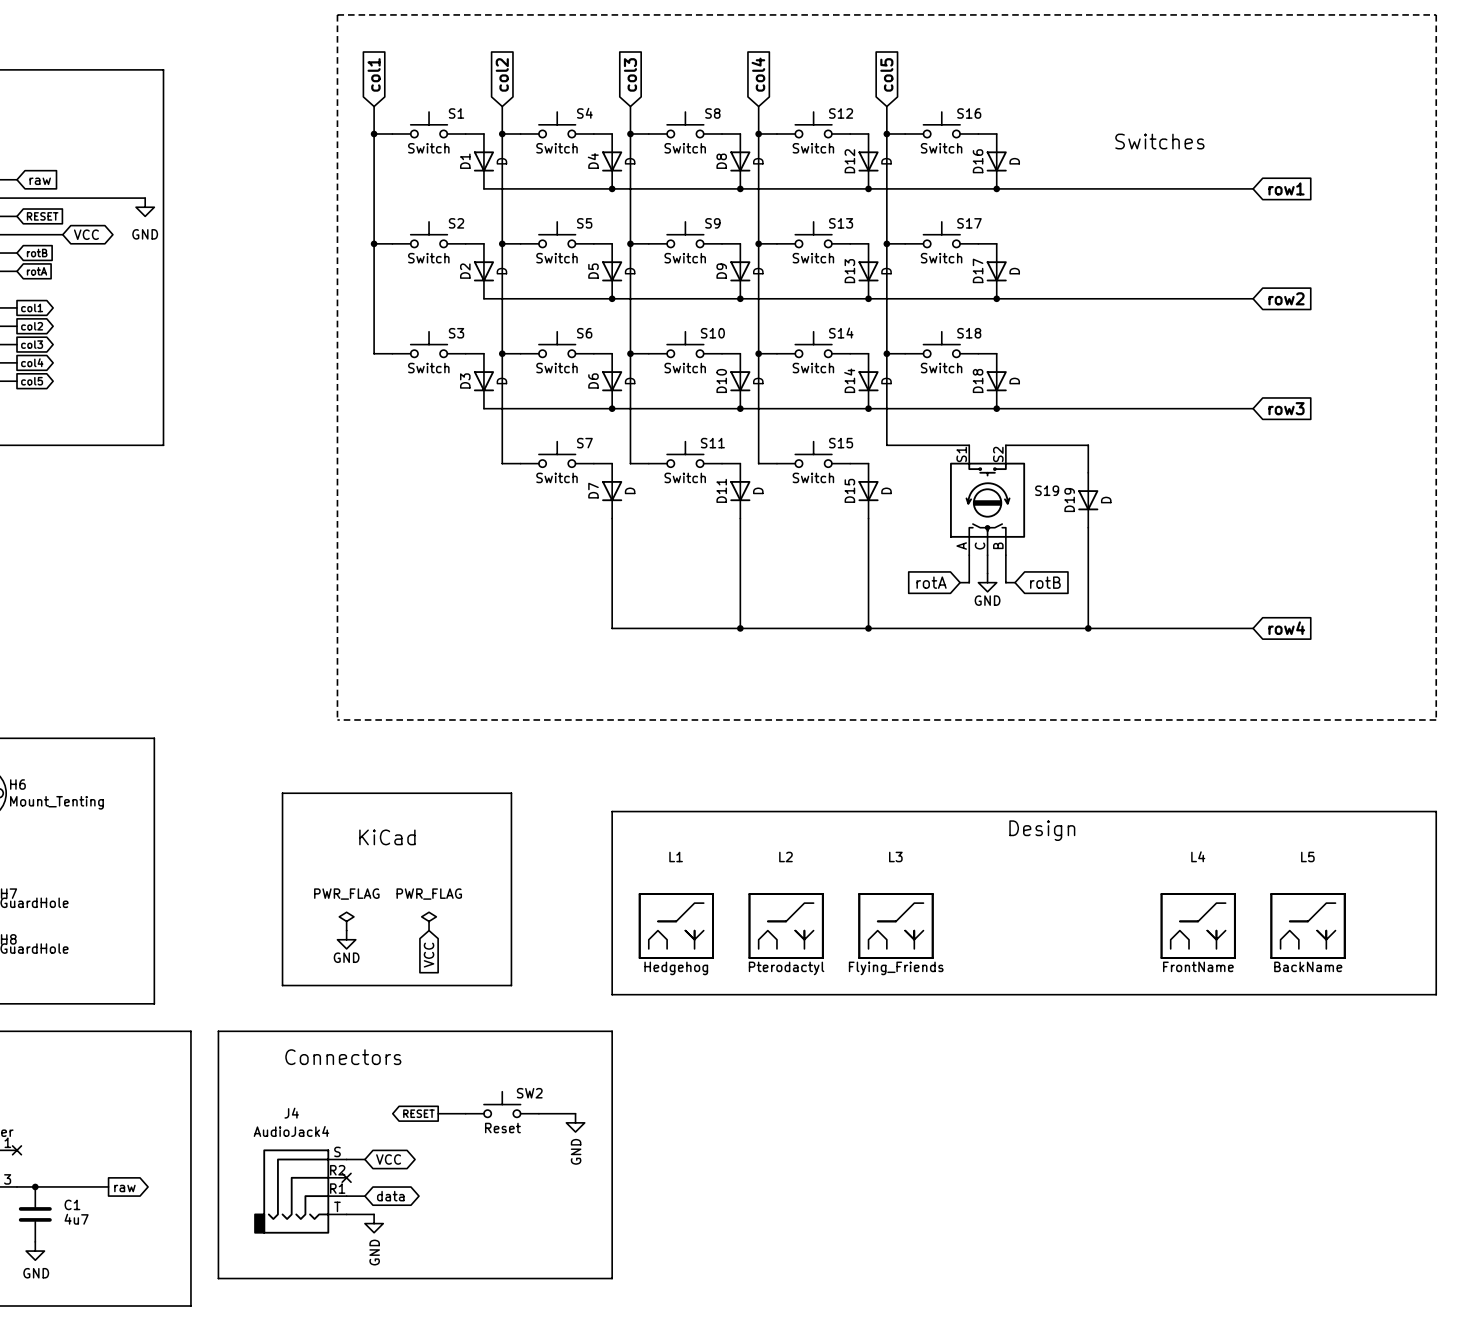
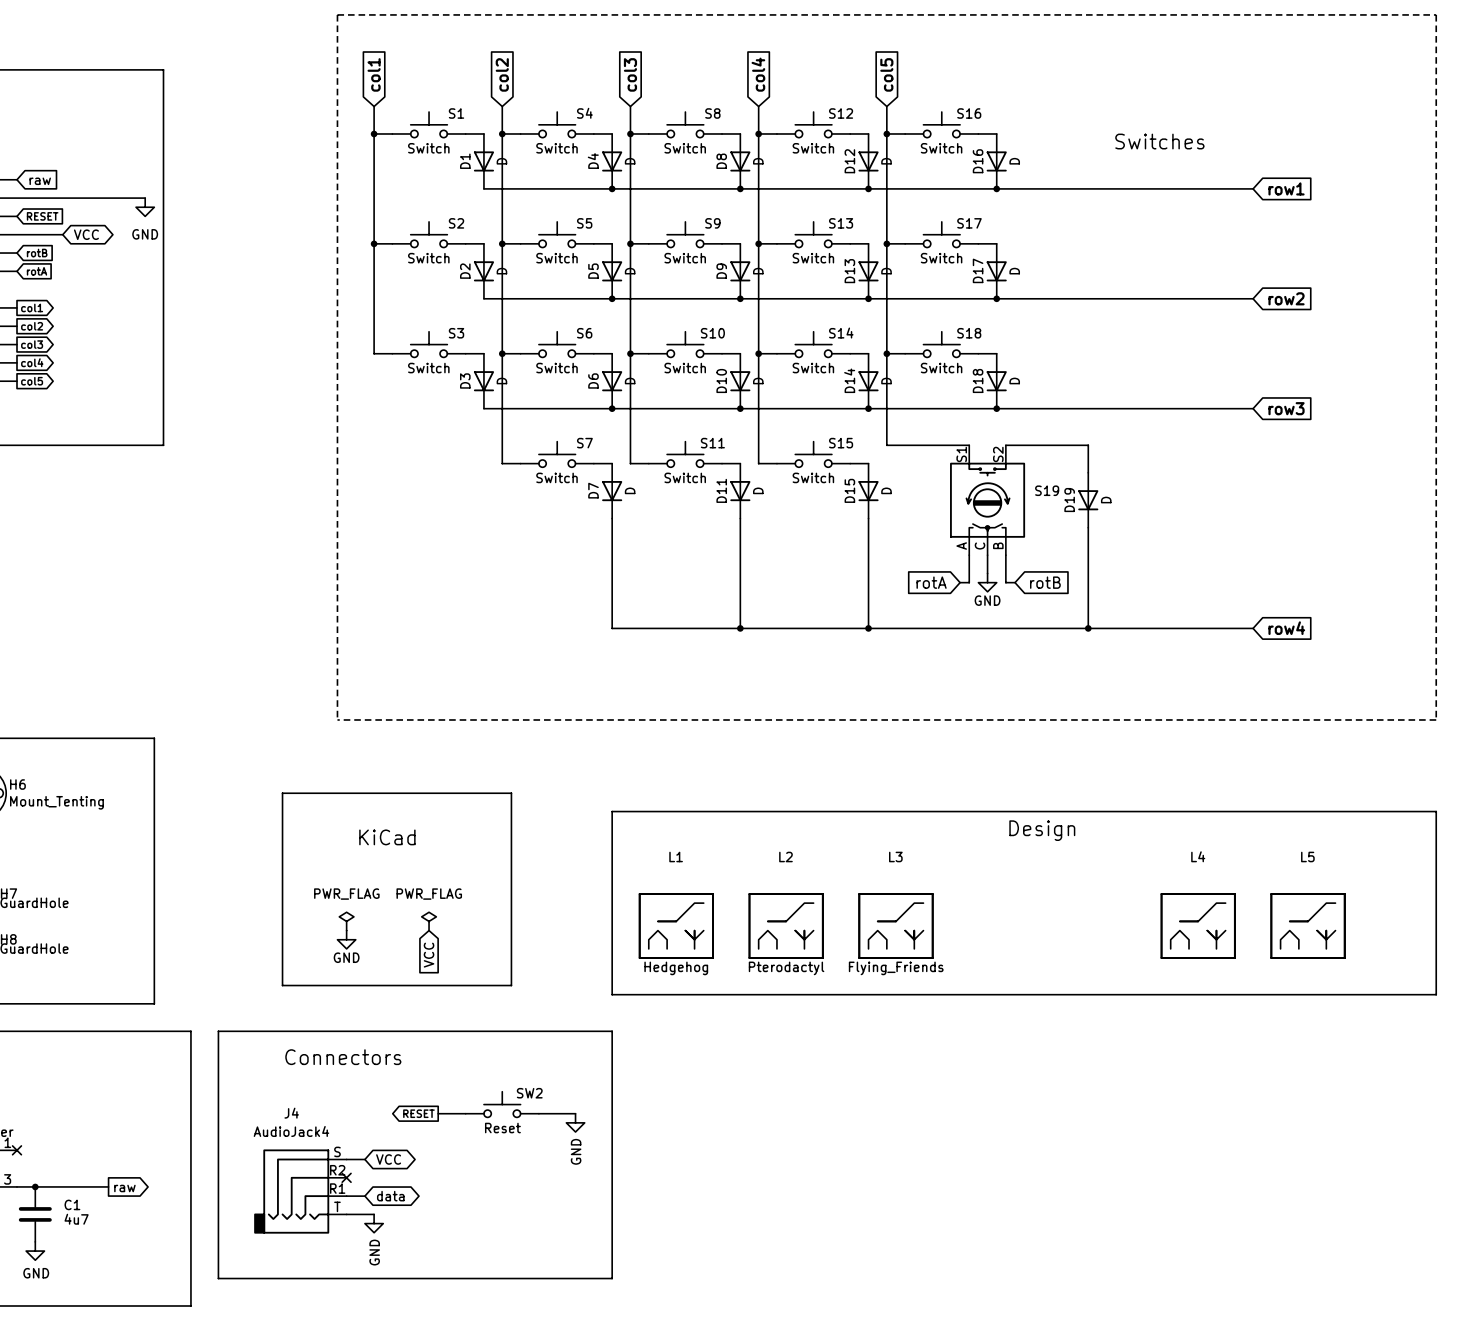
L4 value: FrontName (1198, 966) -> none
L5 value: BackName (1308, 966) -> none

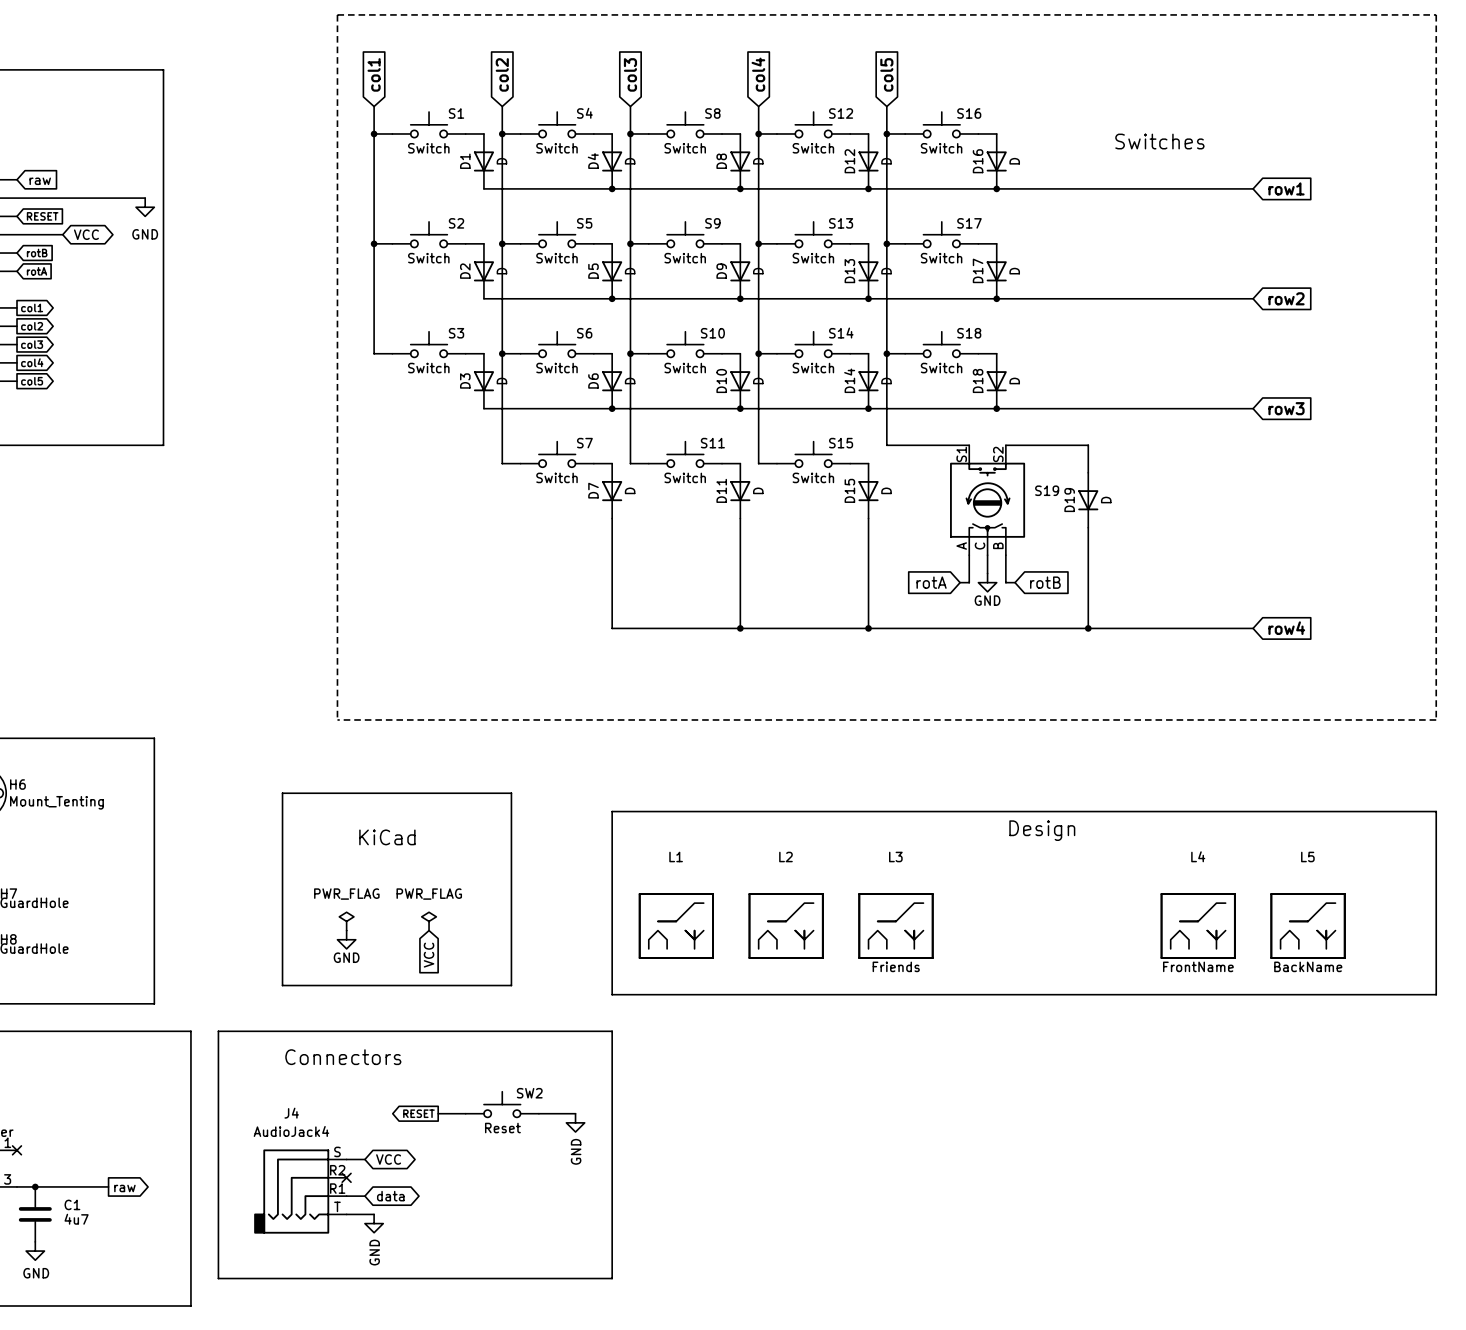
L4 value: none -> FrontName (1198, 966)
L5 value: none -> BackName (1308, 966)
L1 value: Hedgehog (676, 968) -> none
L2 value: Pterodactyl (786, 968) -> none
L3 value: Flying_Friends (896, 968) -> Friends (896, 966)

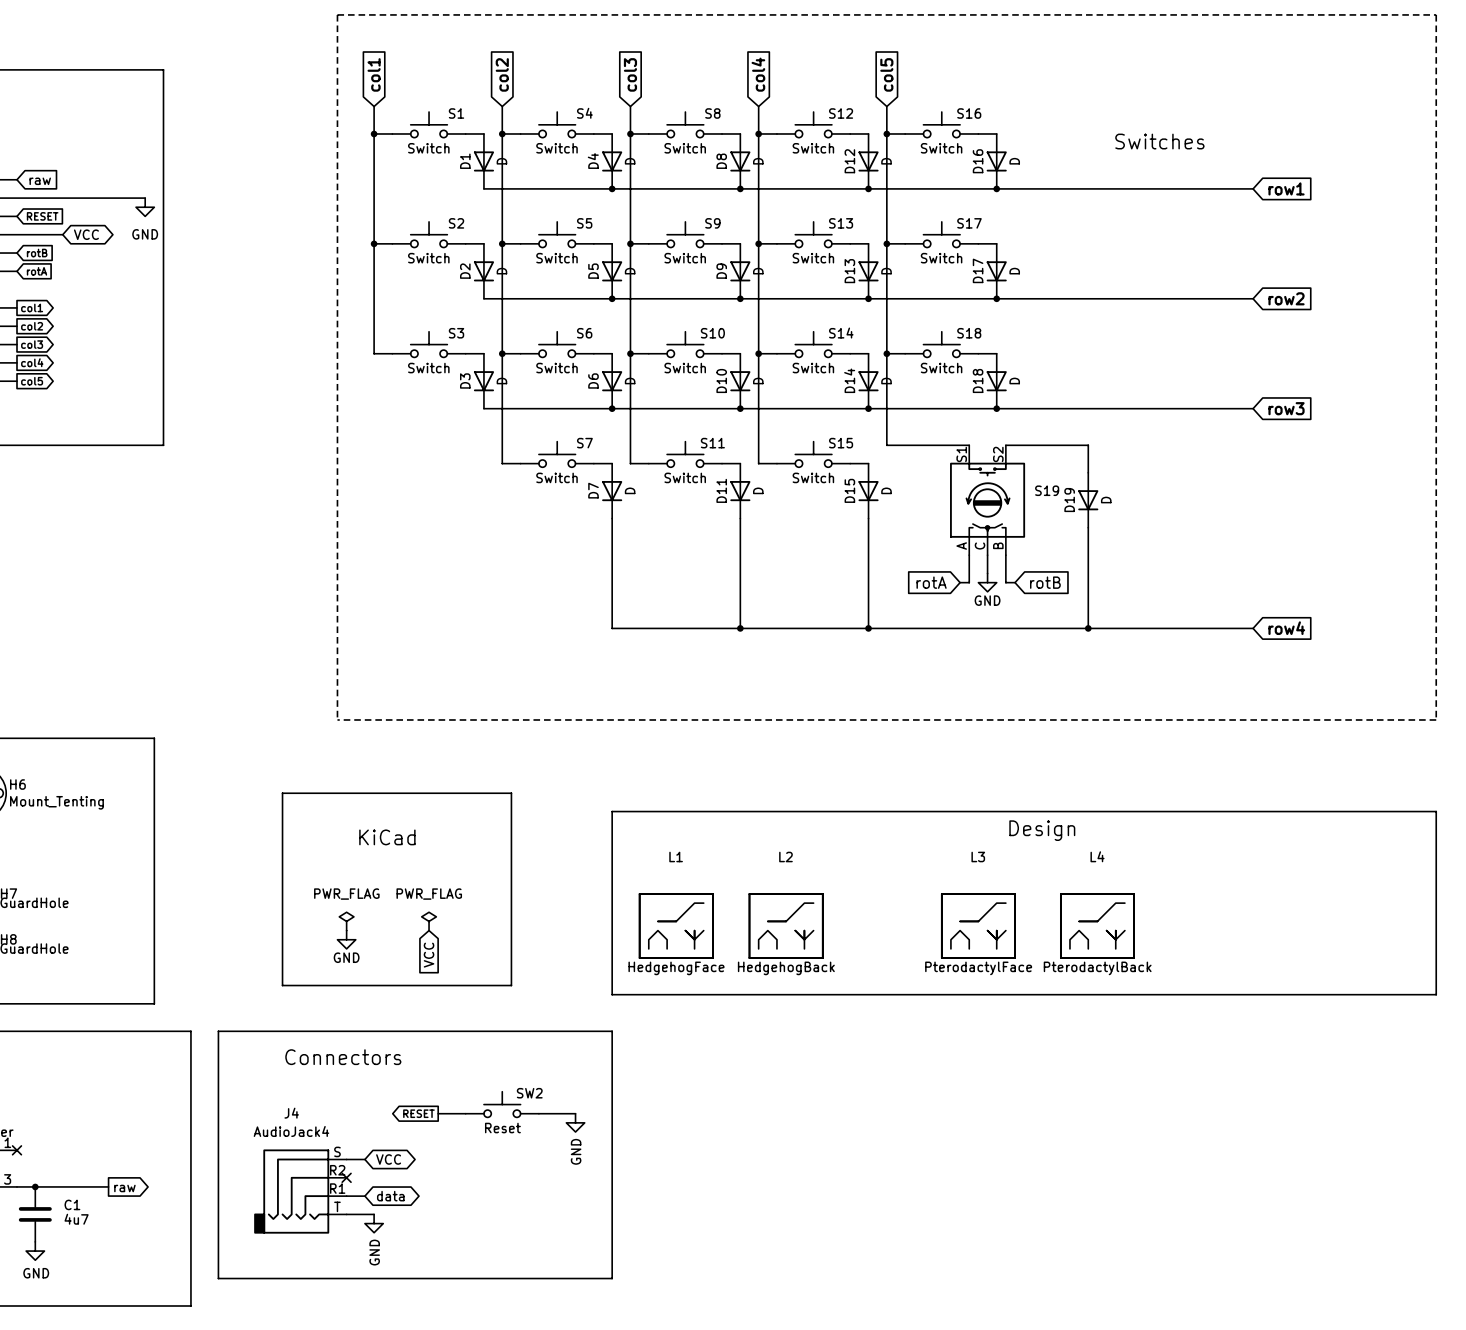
L3 position: (896, 926) -> (978, 926)
L4 position: (1198, 926) -> (1097, 926)
L5: BackName (1308, 926) -> none
L3 value: Friends (896, 966) -> PterodactylFace (978, 968)
L4 value: FrontName (1198, 966) -> PterodactylBack (1097, 968)
L1 value: none -> HedgehogFace (676, 968)
L2 value: none -> HedgehogBack (786, 968)

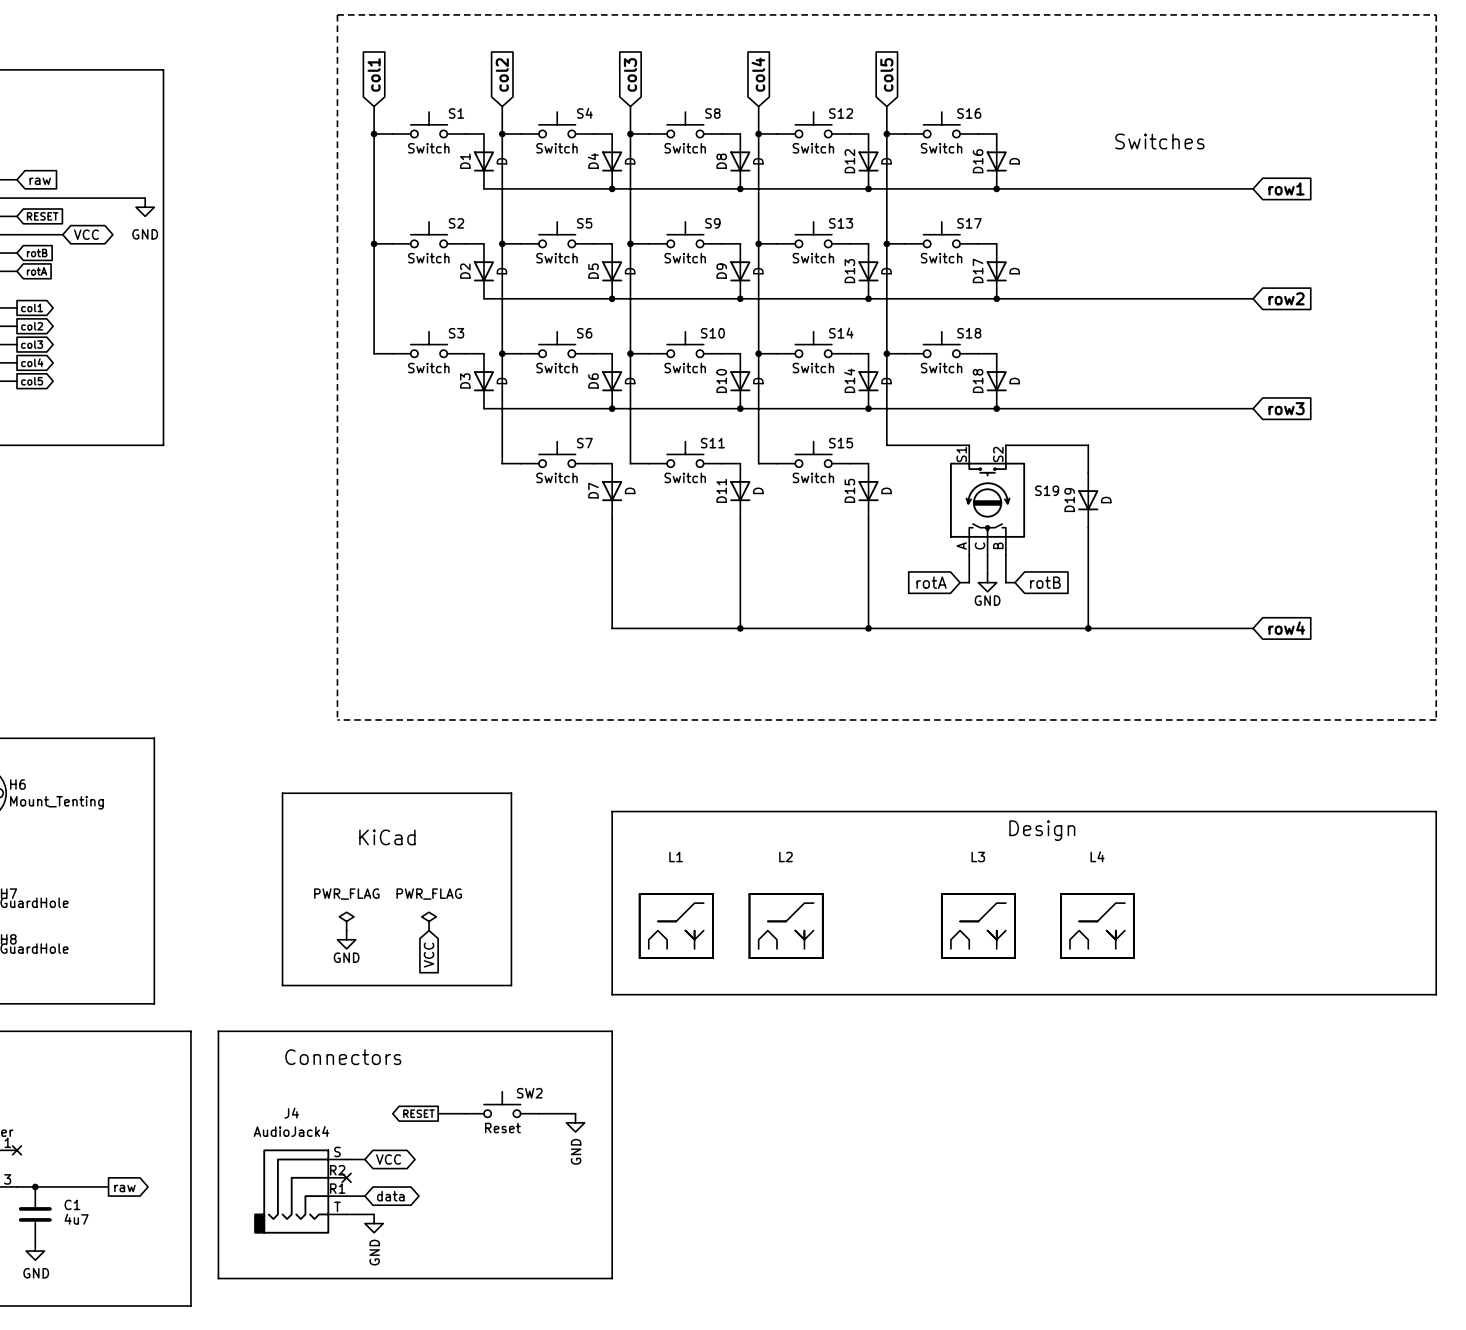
L1 value: HedgehogFace (676, 968) -> none
L2 value: HedgehogBack (786, 968) -> none
L3 value: PterodactylFace (978, 968) -> none
L4 value: PterodactylBack (1097, 968) -> none

